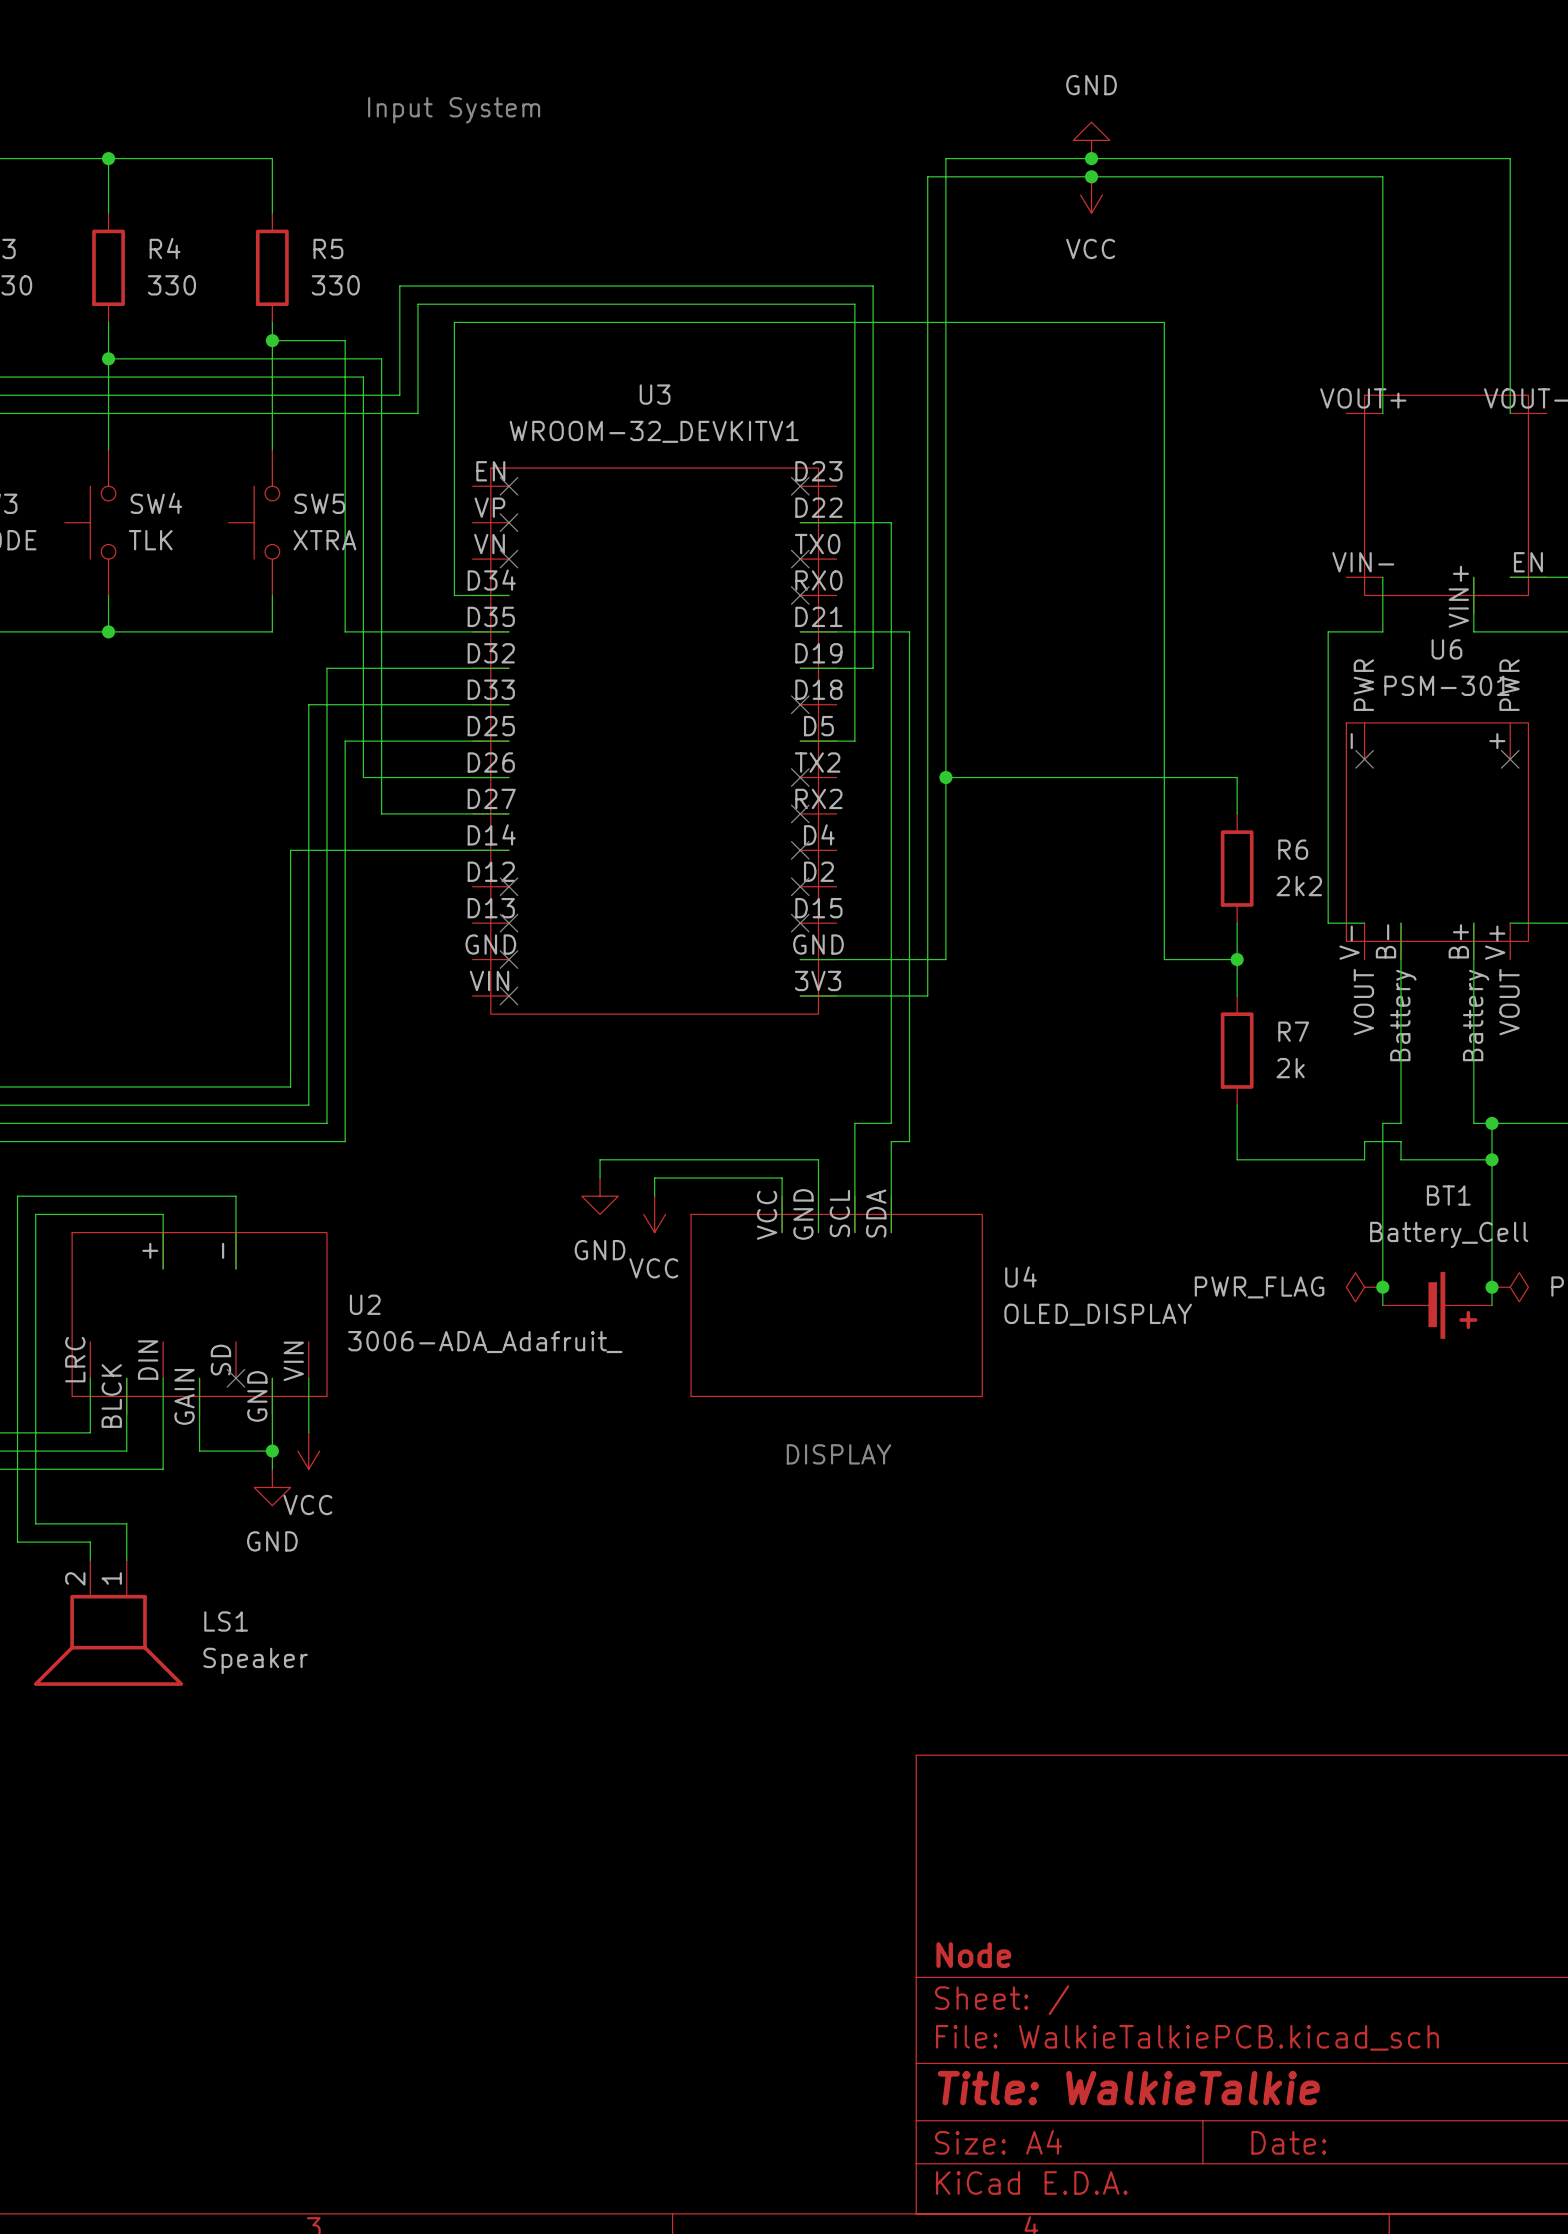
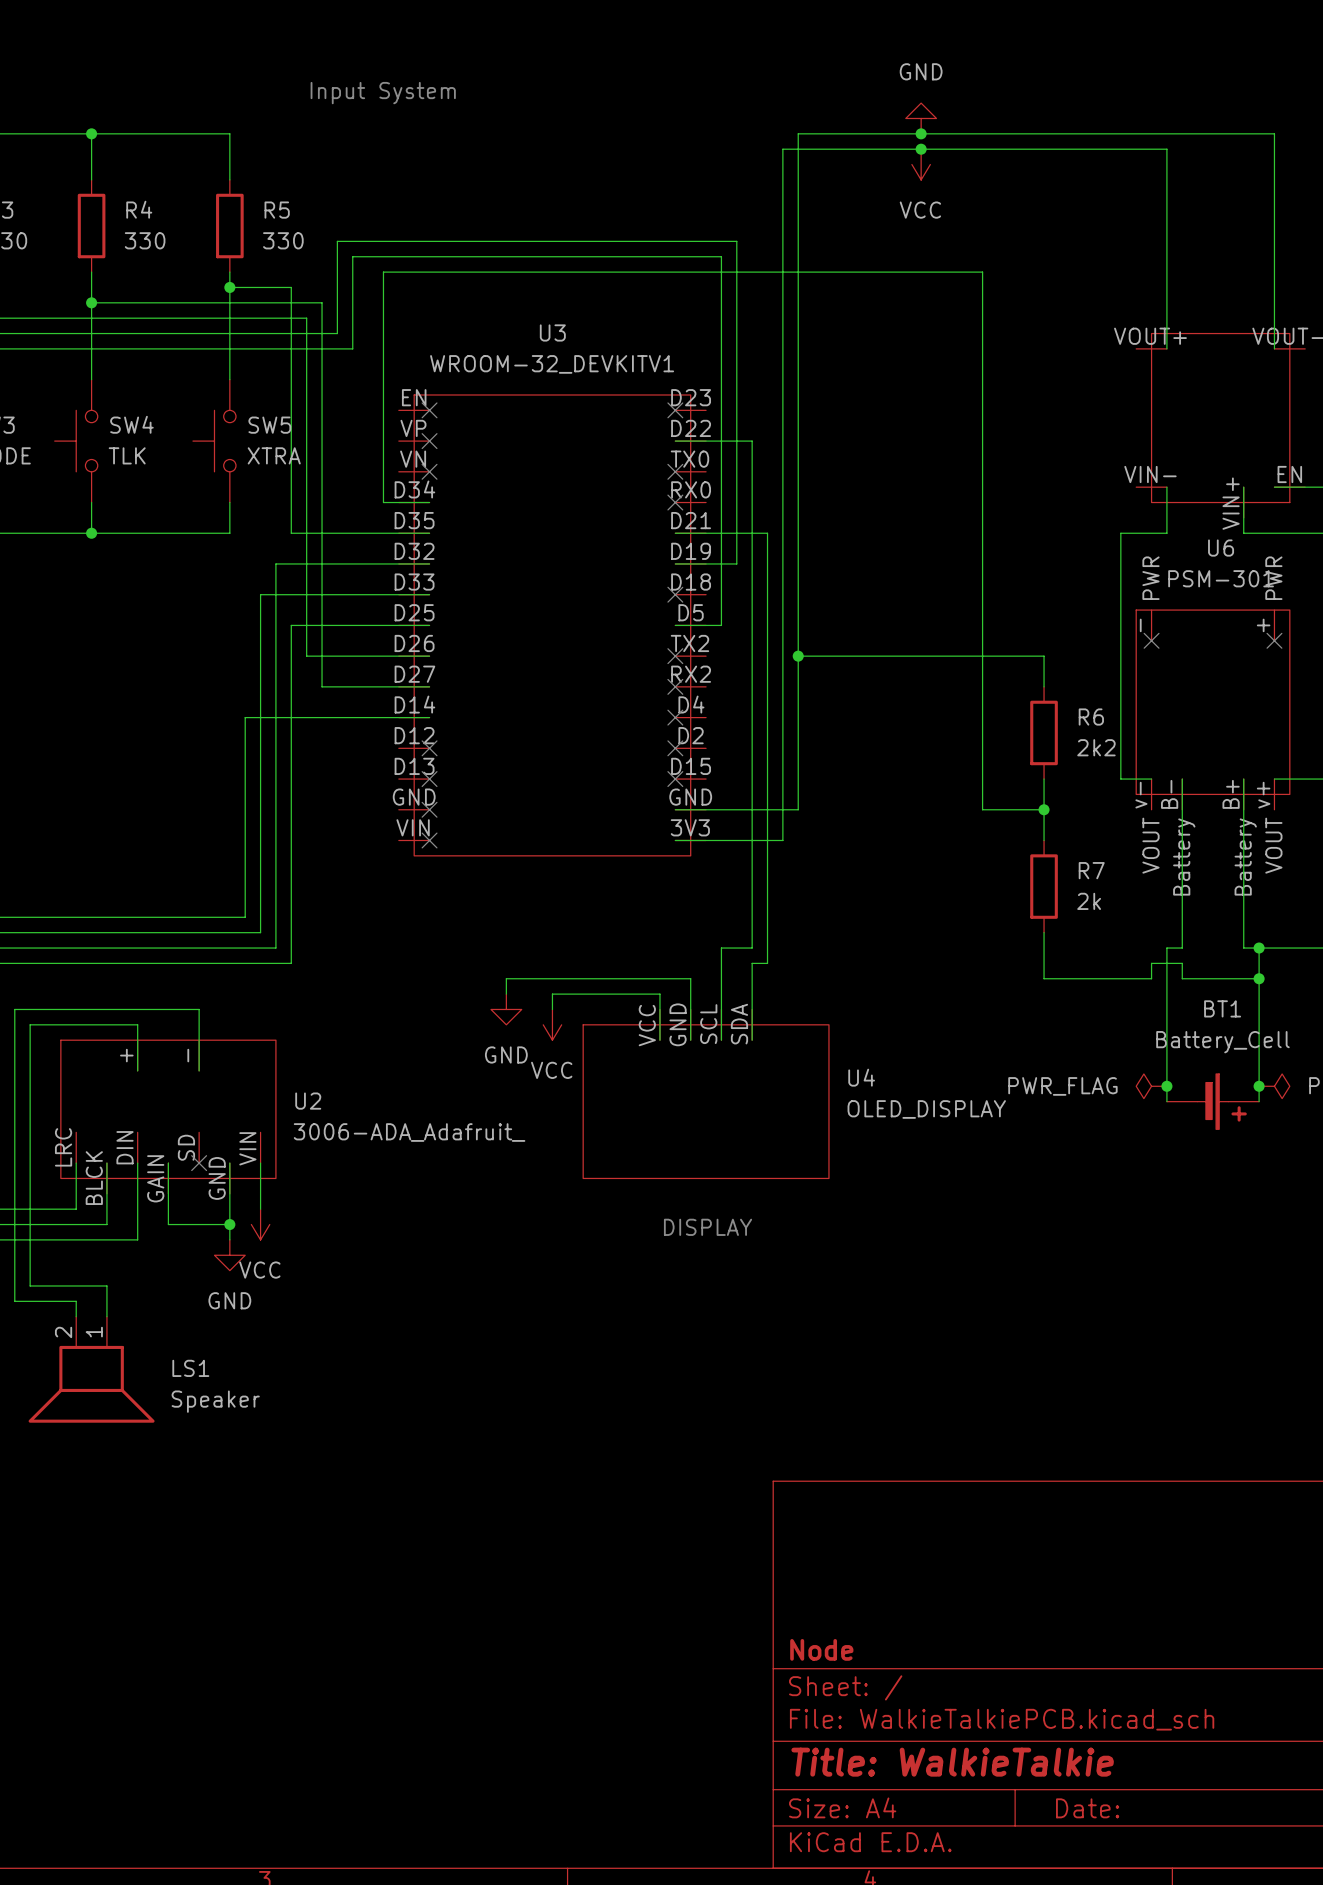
part pin number: V- (1349, 942) -> v- (1141, 795)
part pin number: V+ (1495, 942) -> v+ (1263, 795)

